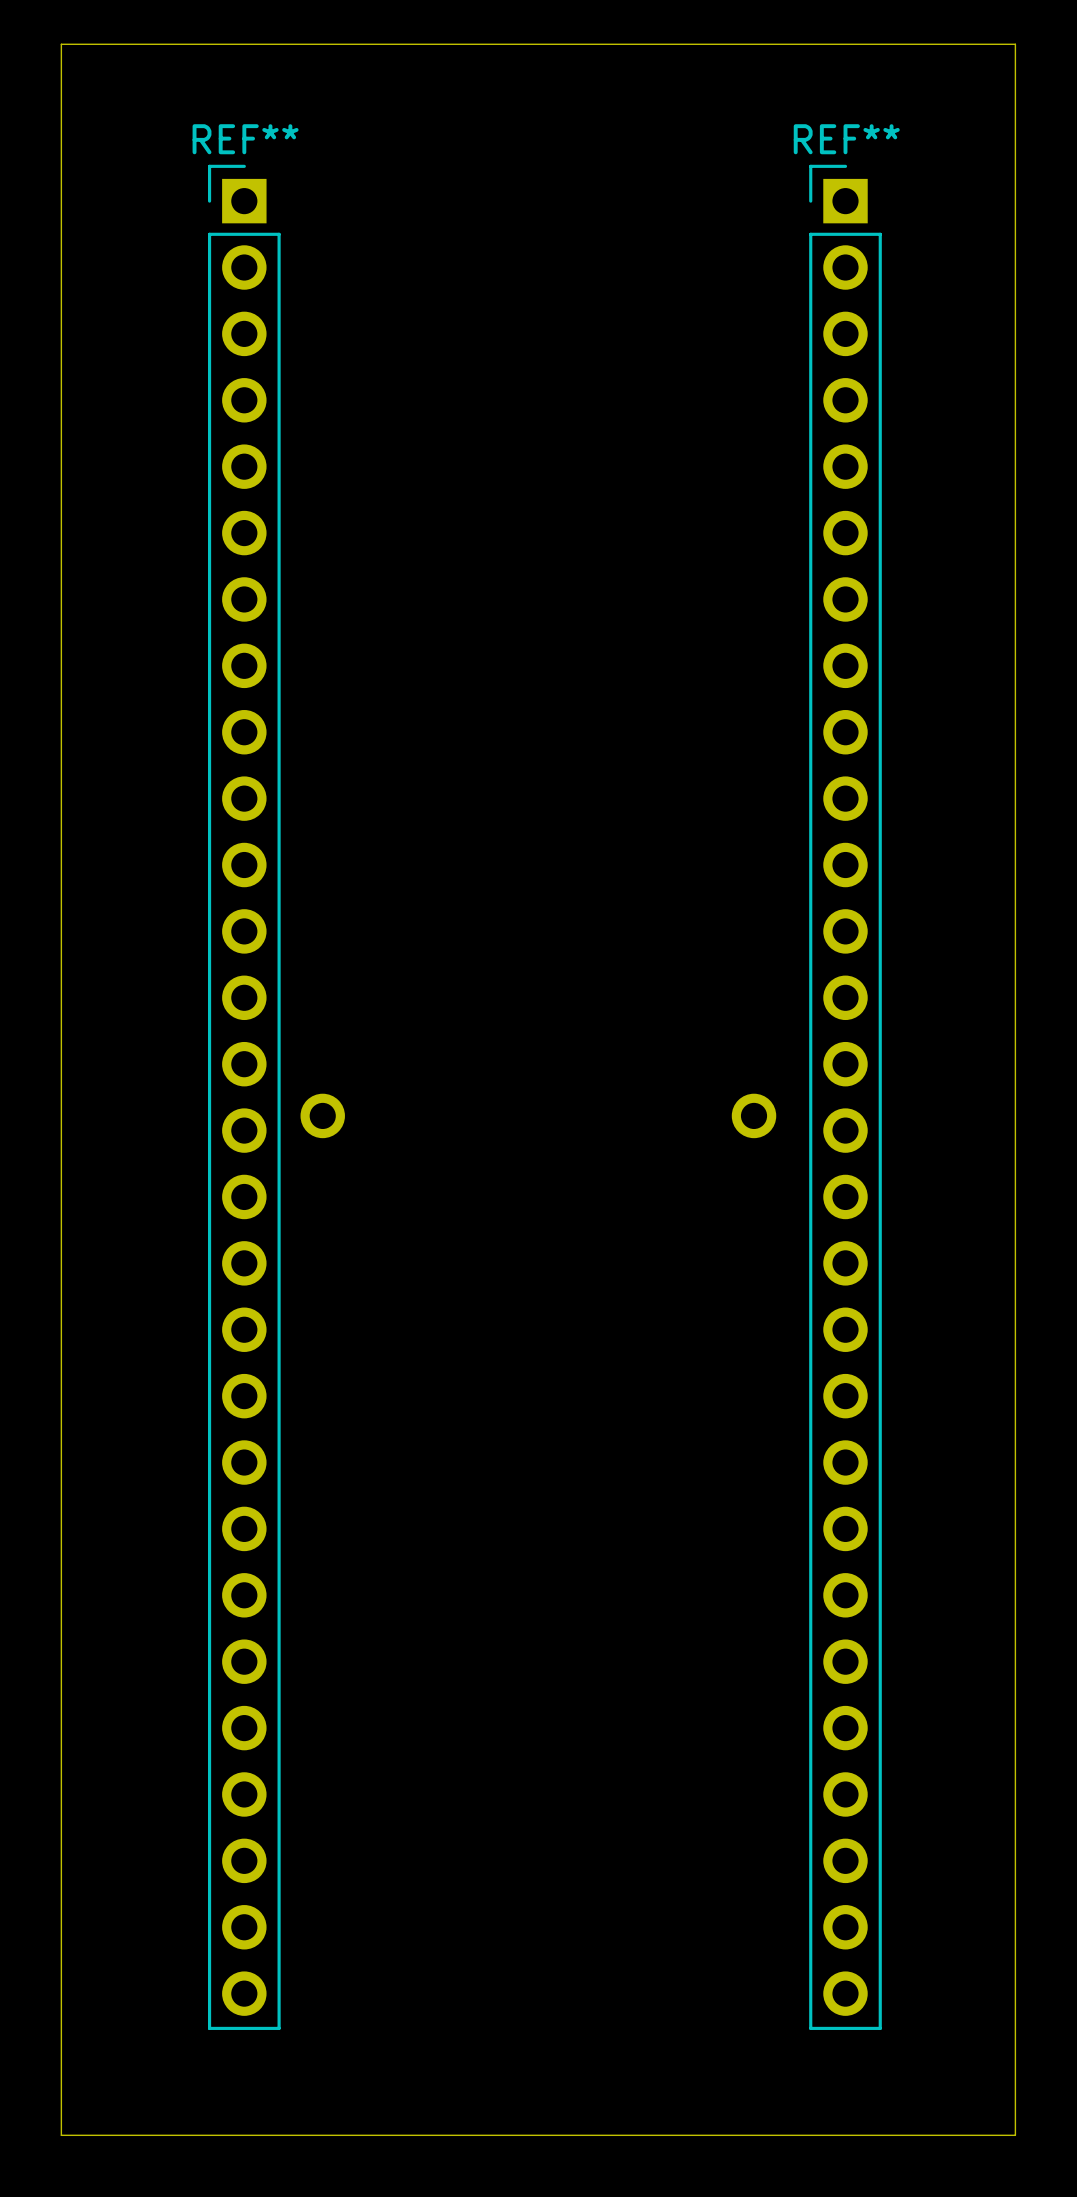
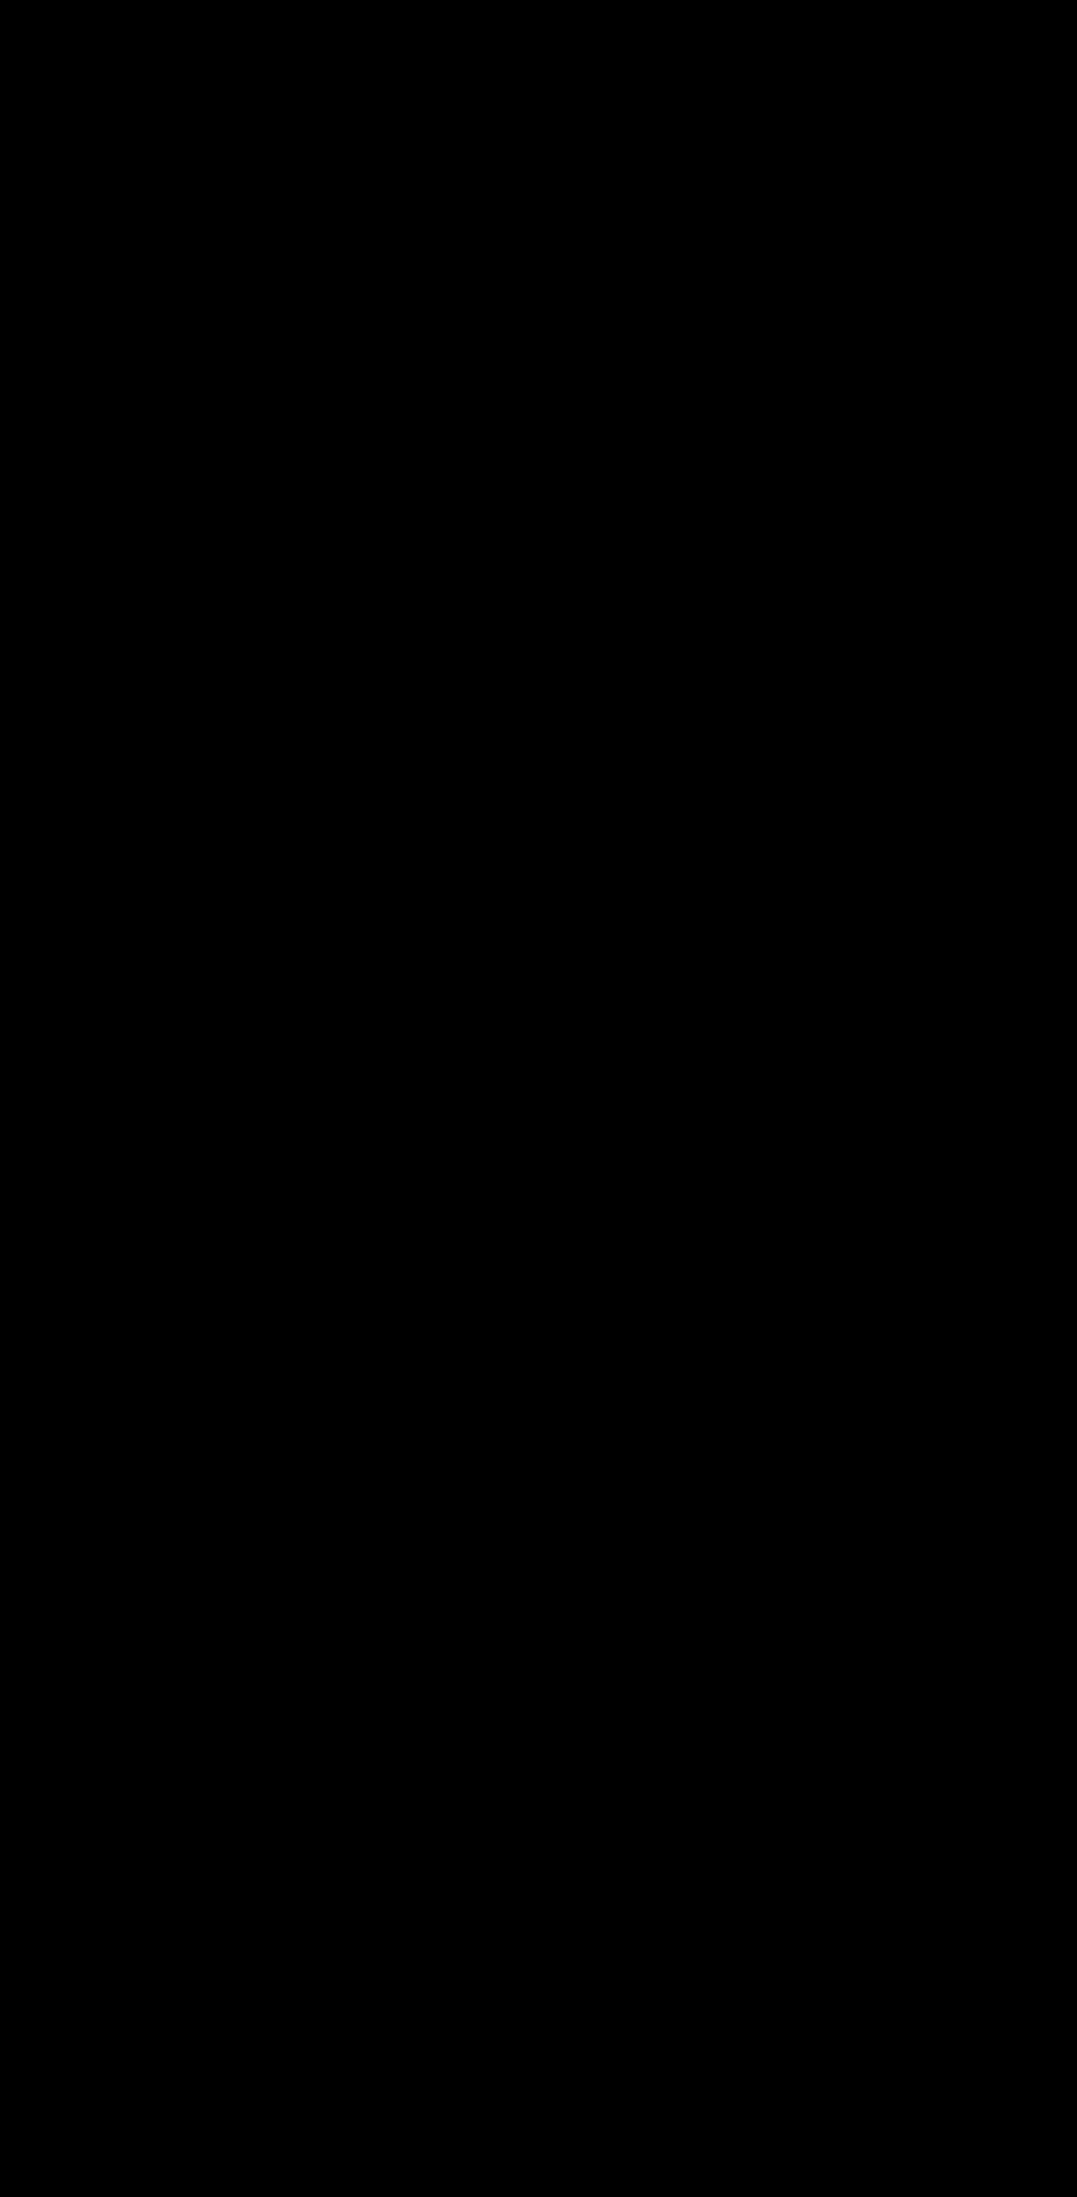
board edge: (61, 44) (1015, 44) (1015, 2135) (61, 2135) (61, 44) -> none
REF**: (244, 1097) -> none
REF**: (845, 1097) -> none
part: (322, 1115) -> none
part: (754, 1115) -> none

